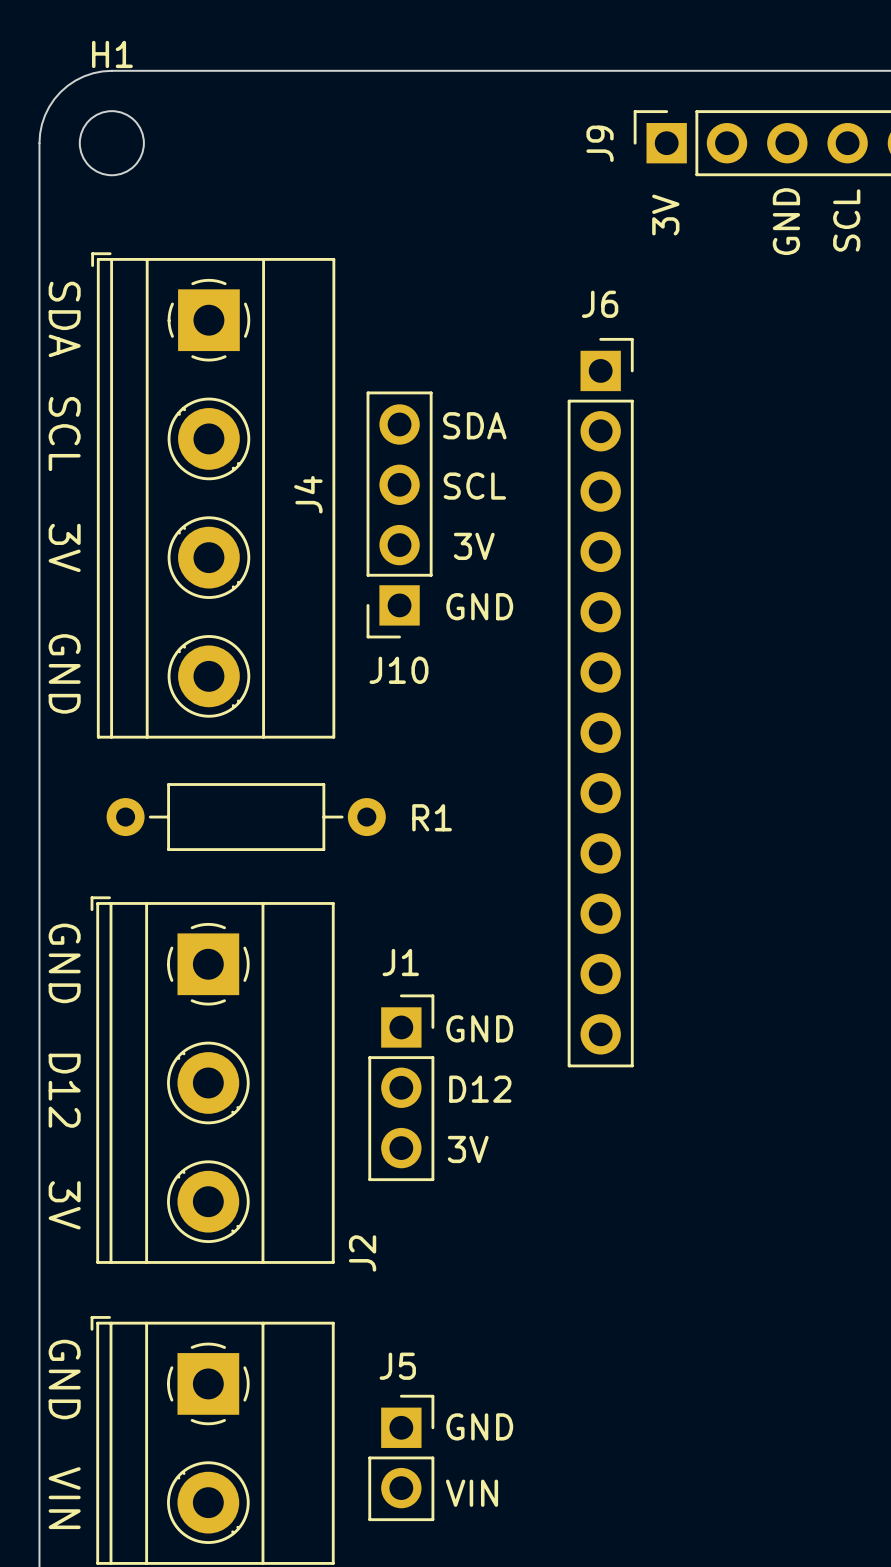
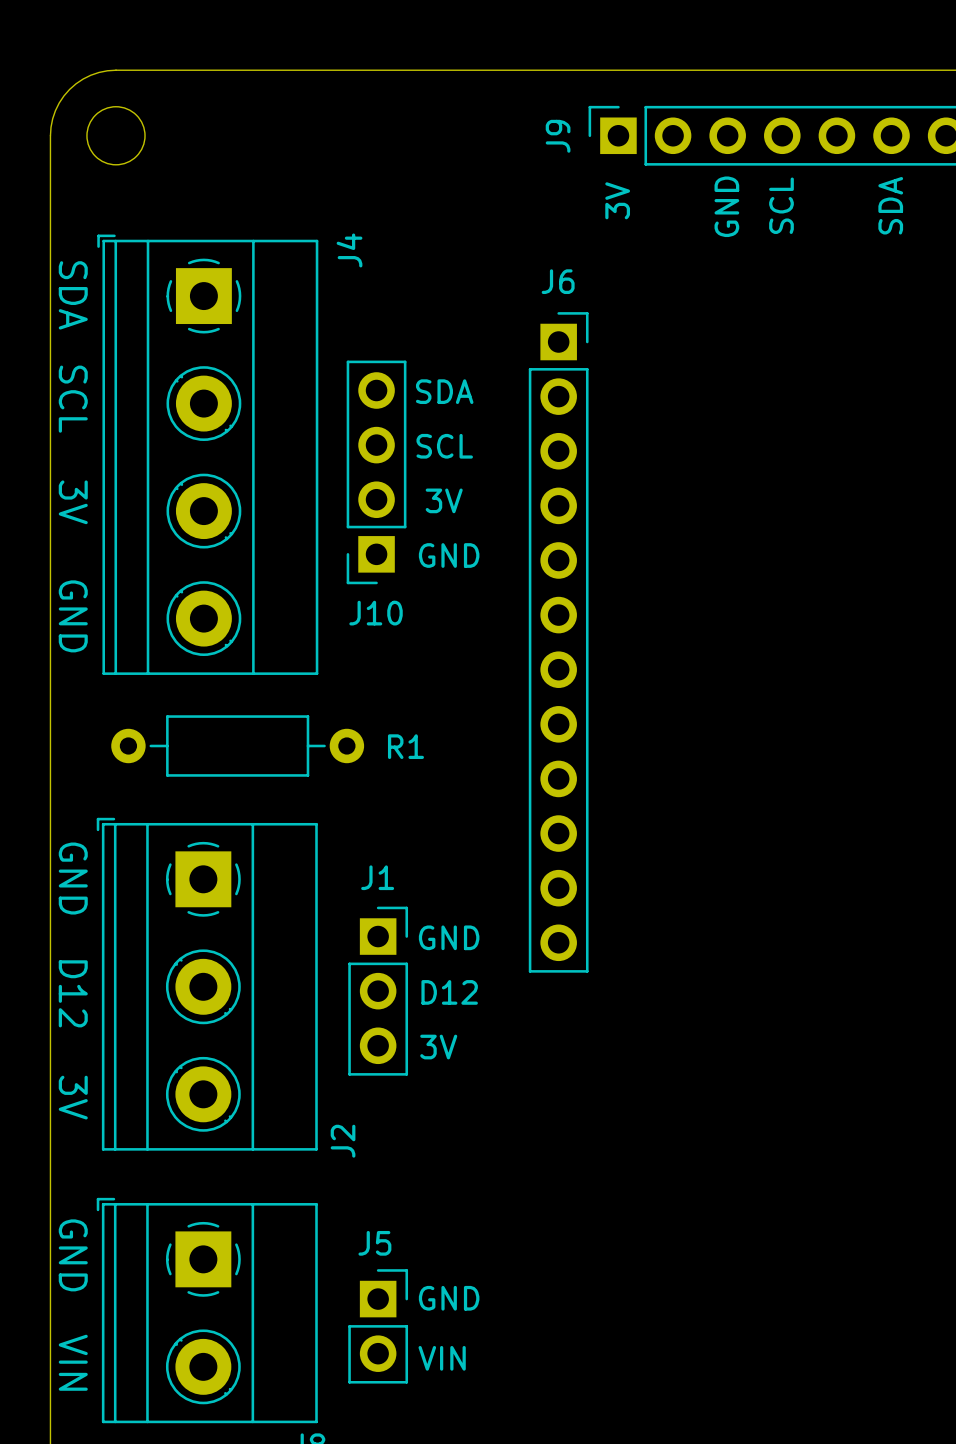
H1 name: H1 (112, 54) -> none
J4 name position: J4 (308, 494) -> J4 (349, 250)

